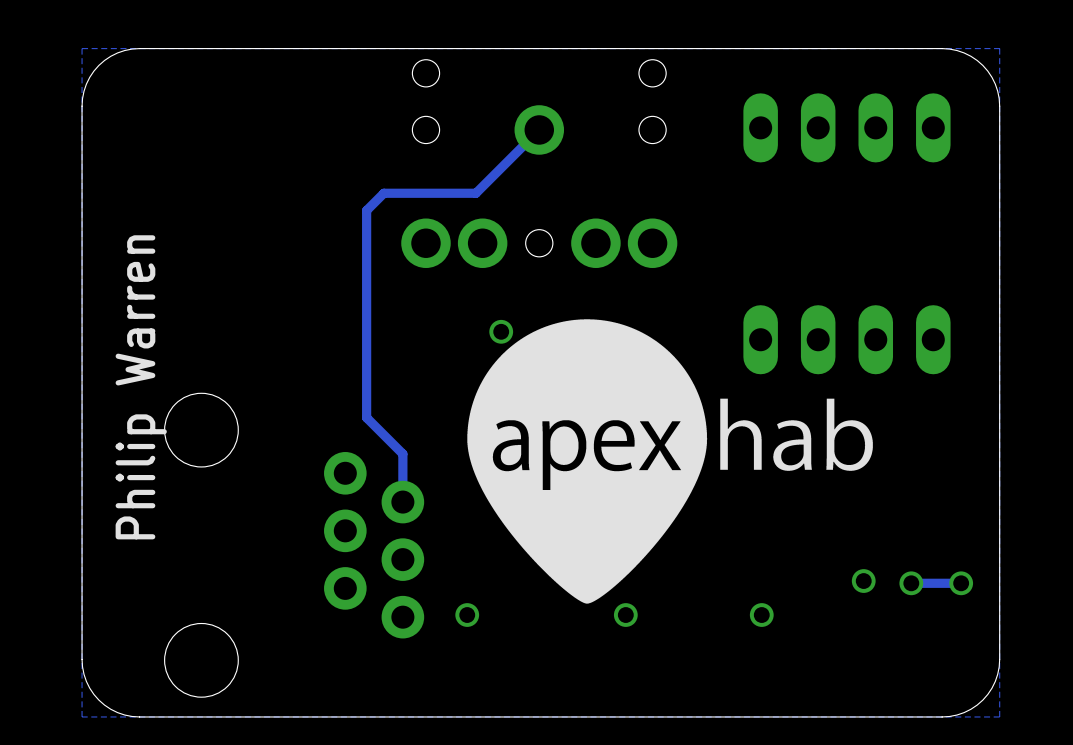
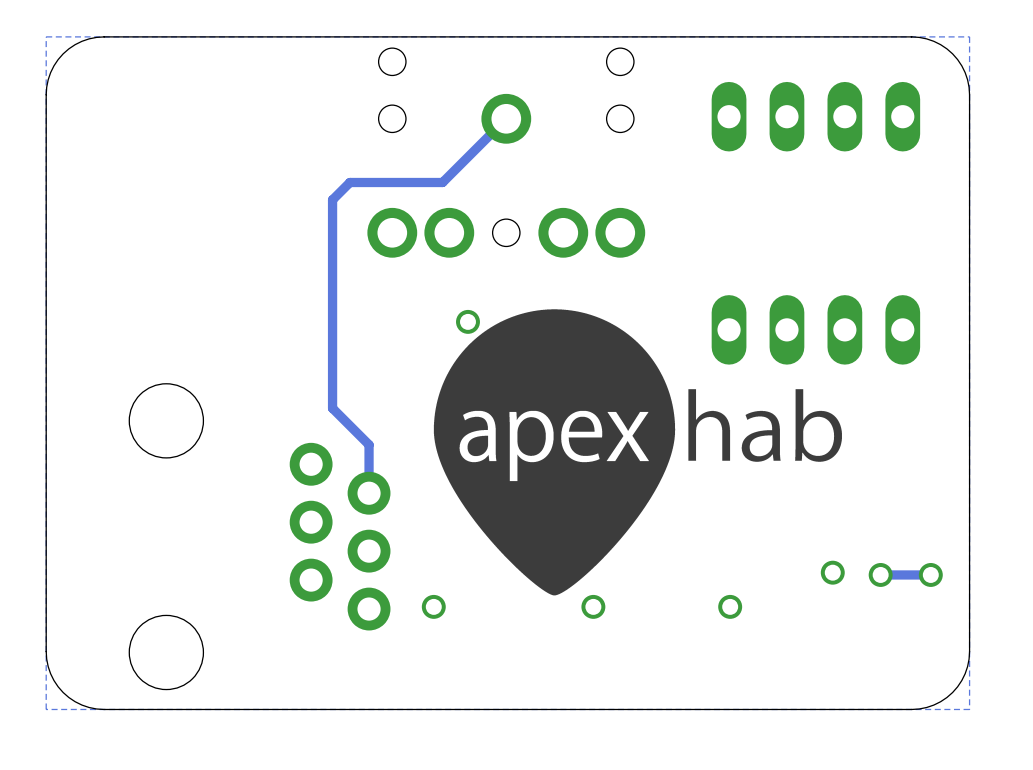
text: Philip Warren (141, 387) -> none

